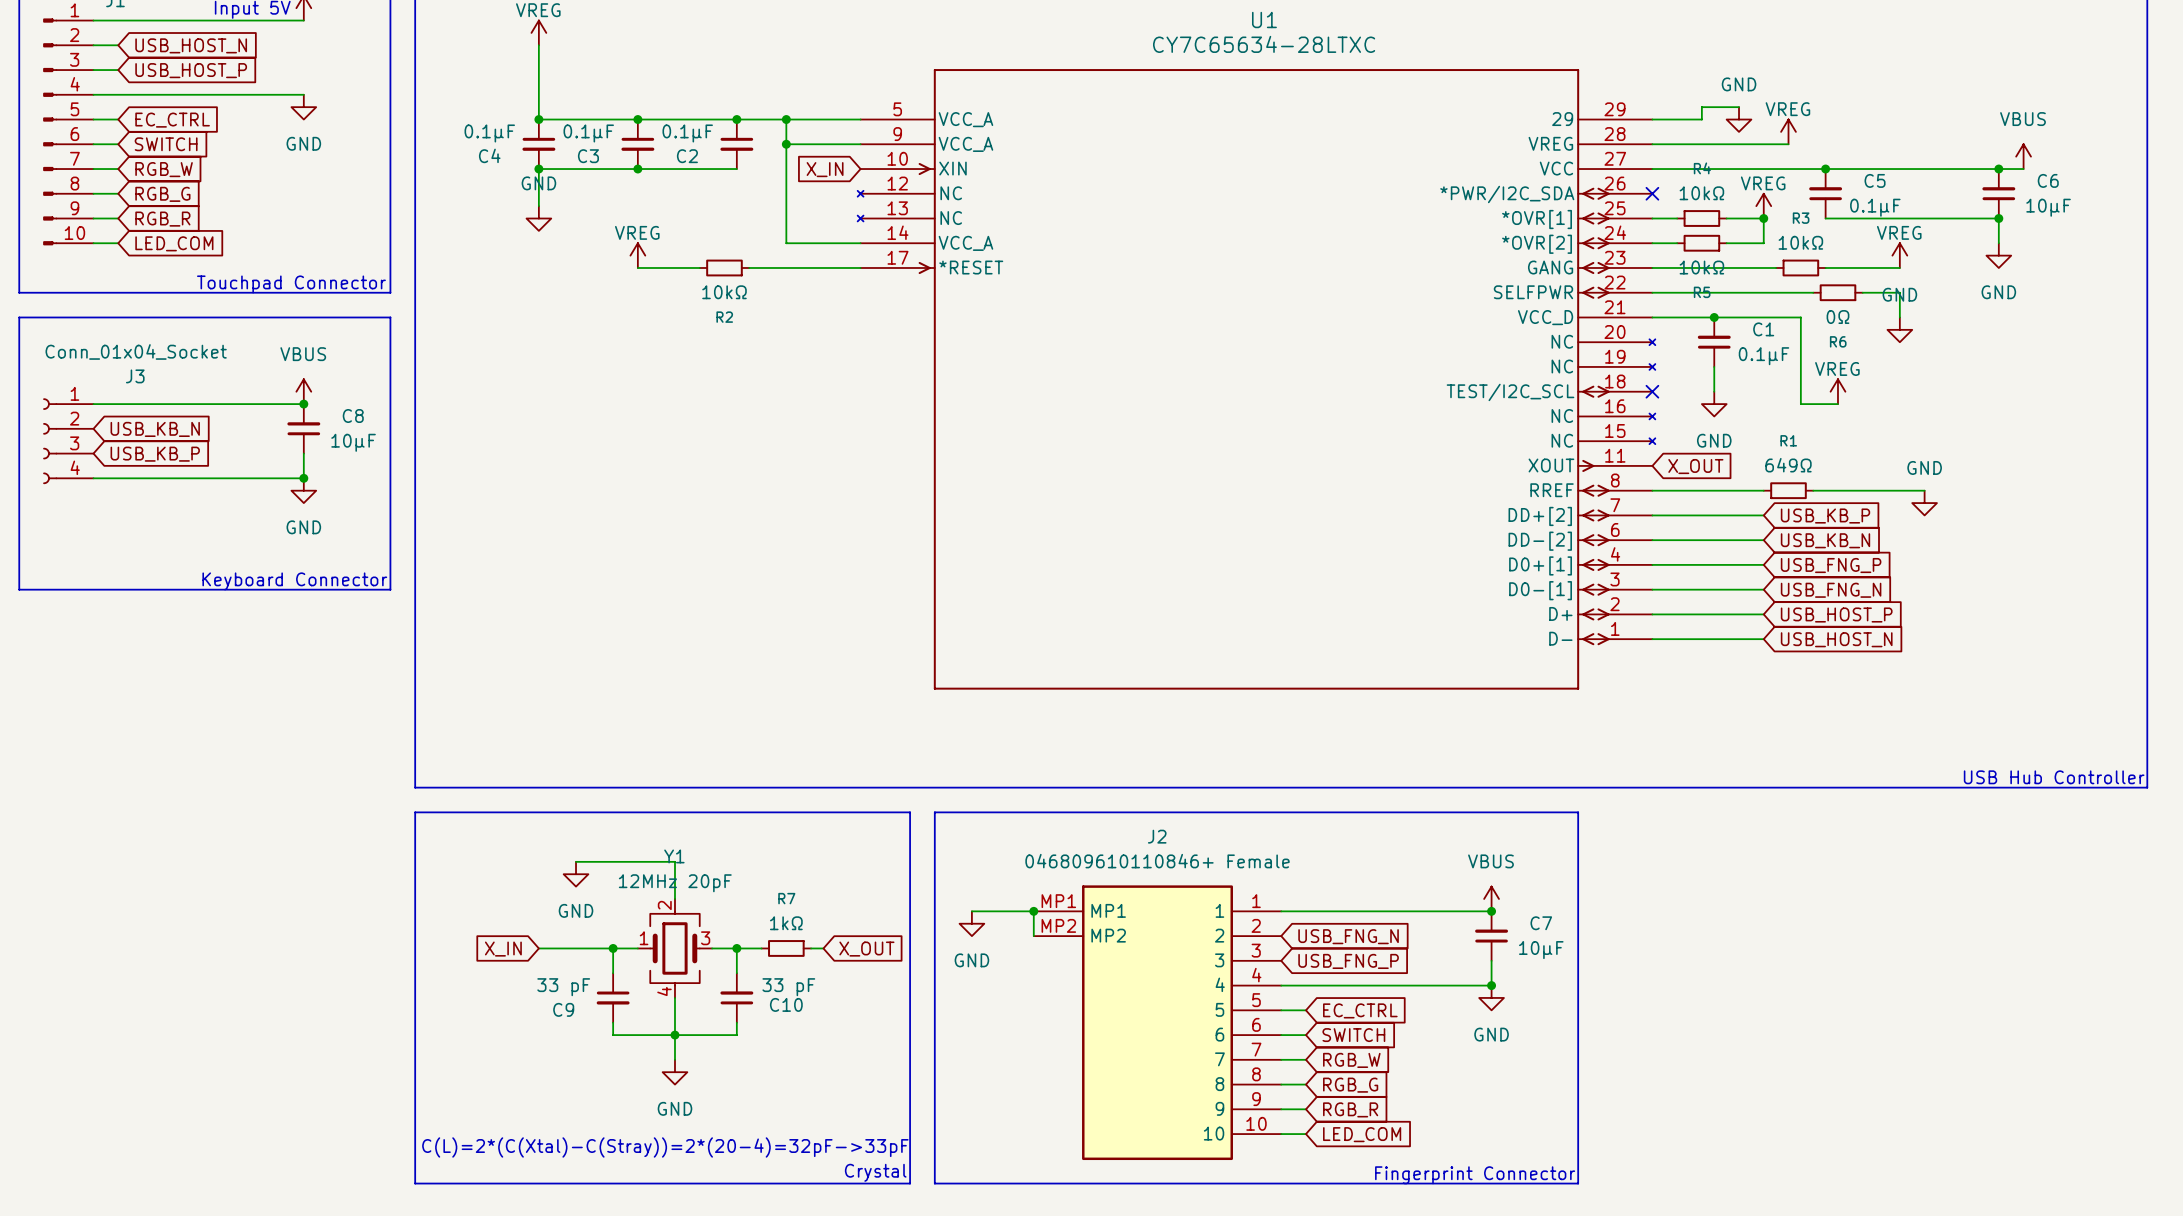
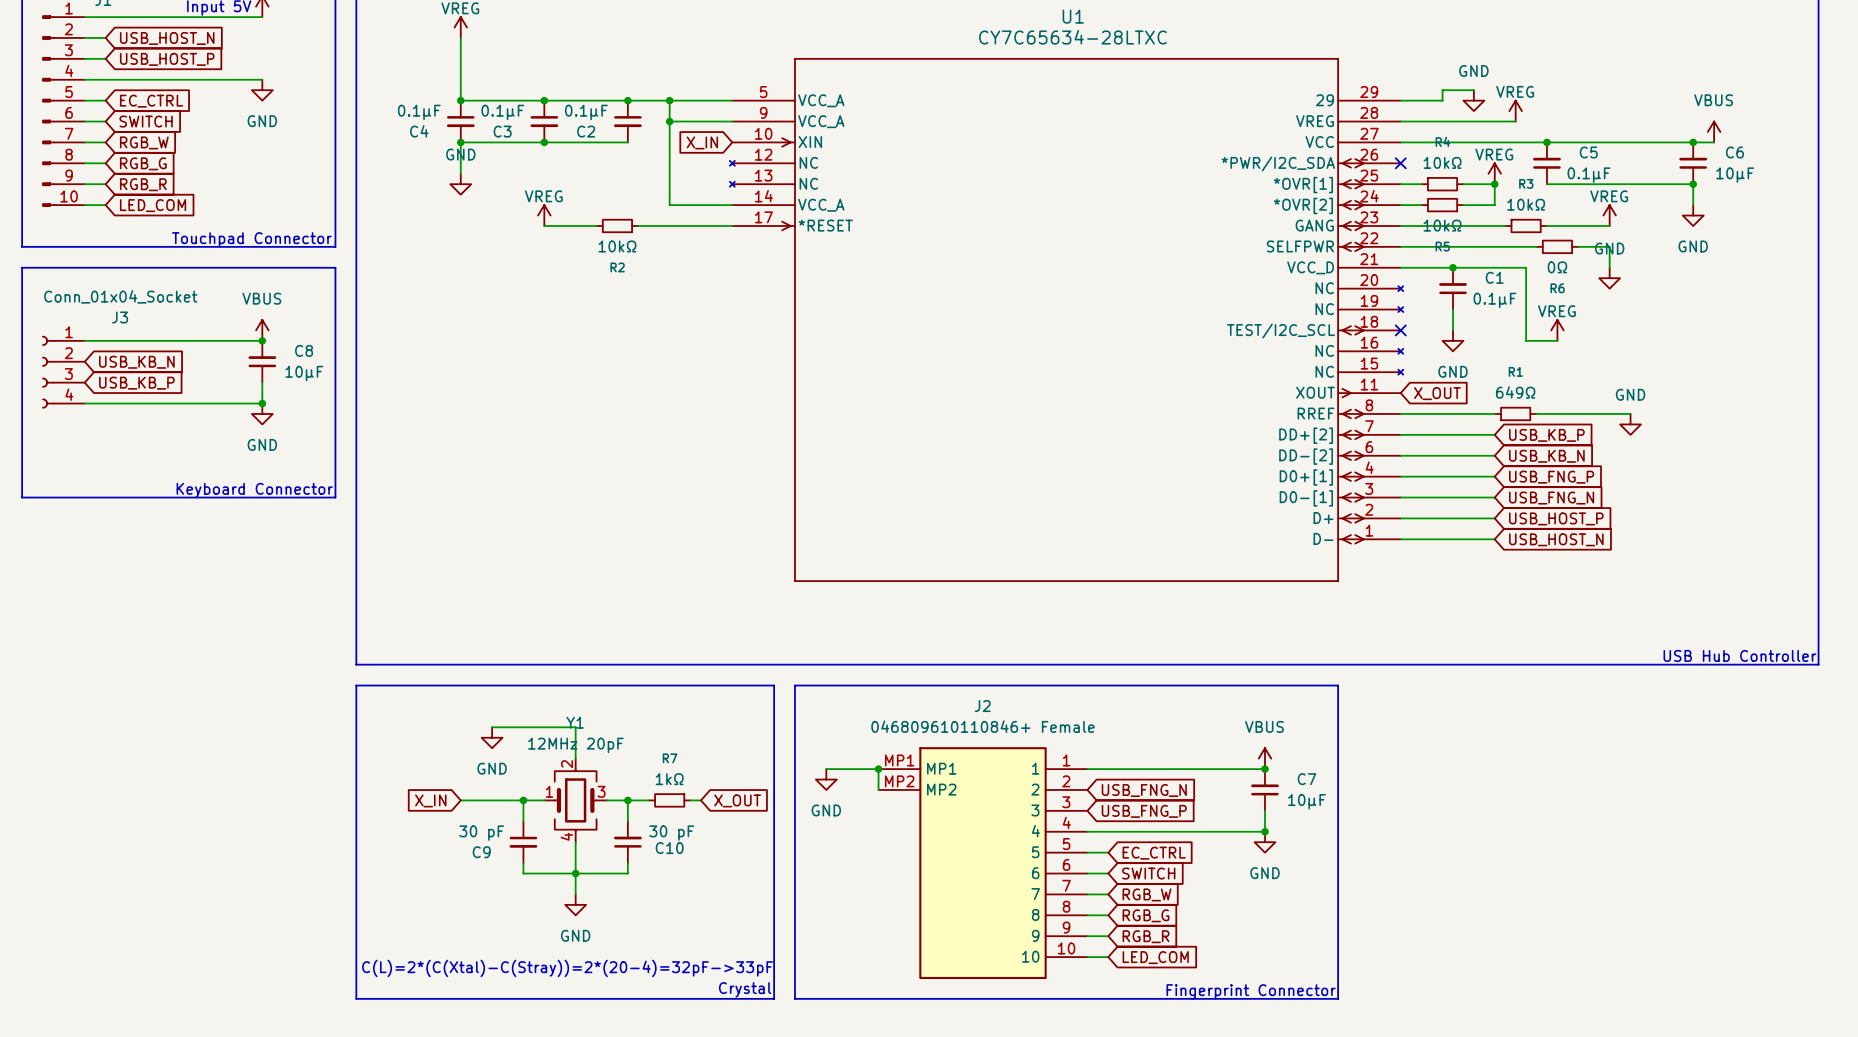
C9 value: 33 pF (563, 987) -> 30 pF (481, 833)
C10 value: 33 pF (788, 987) -> 30 pF (671, 833)

